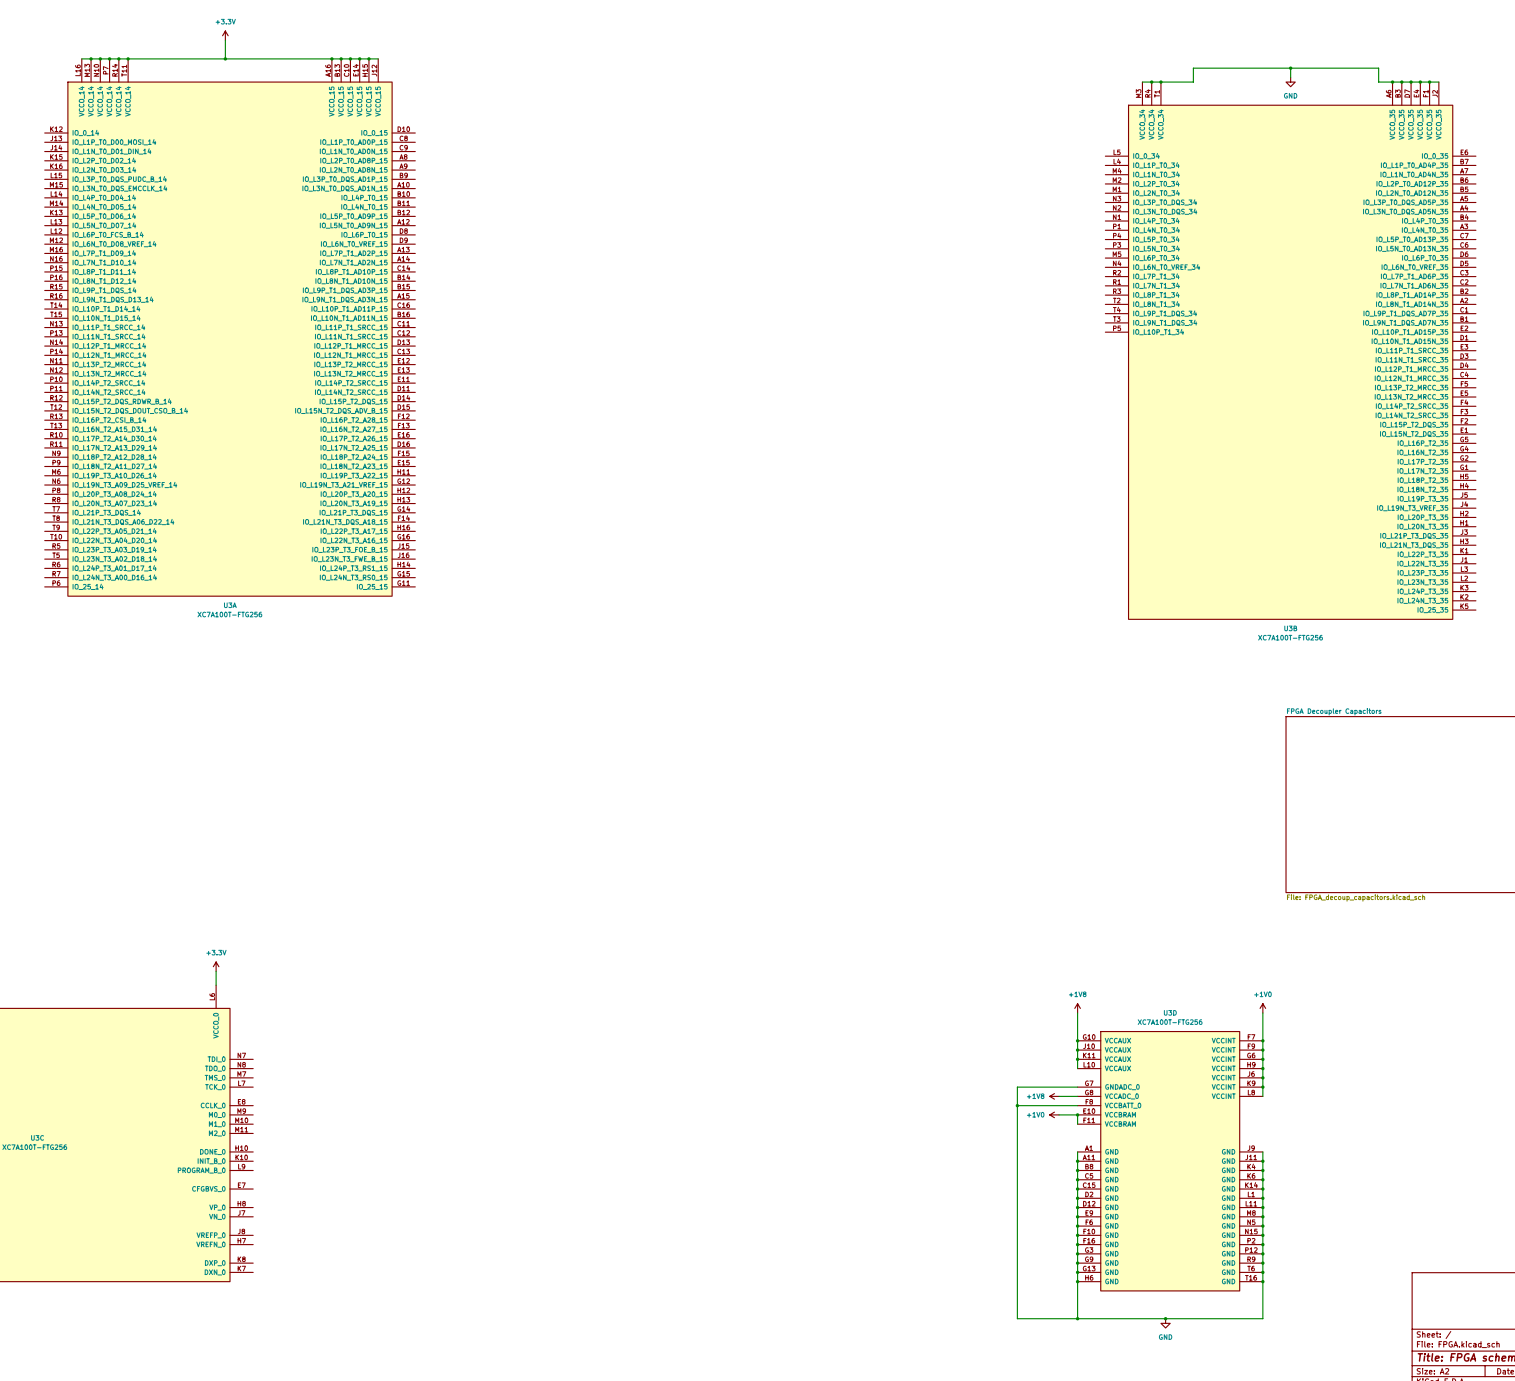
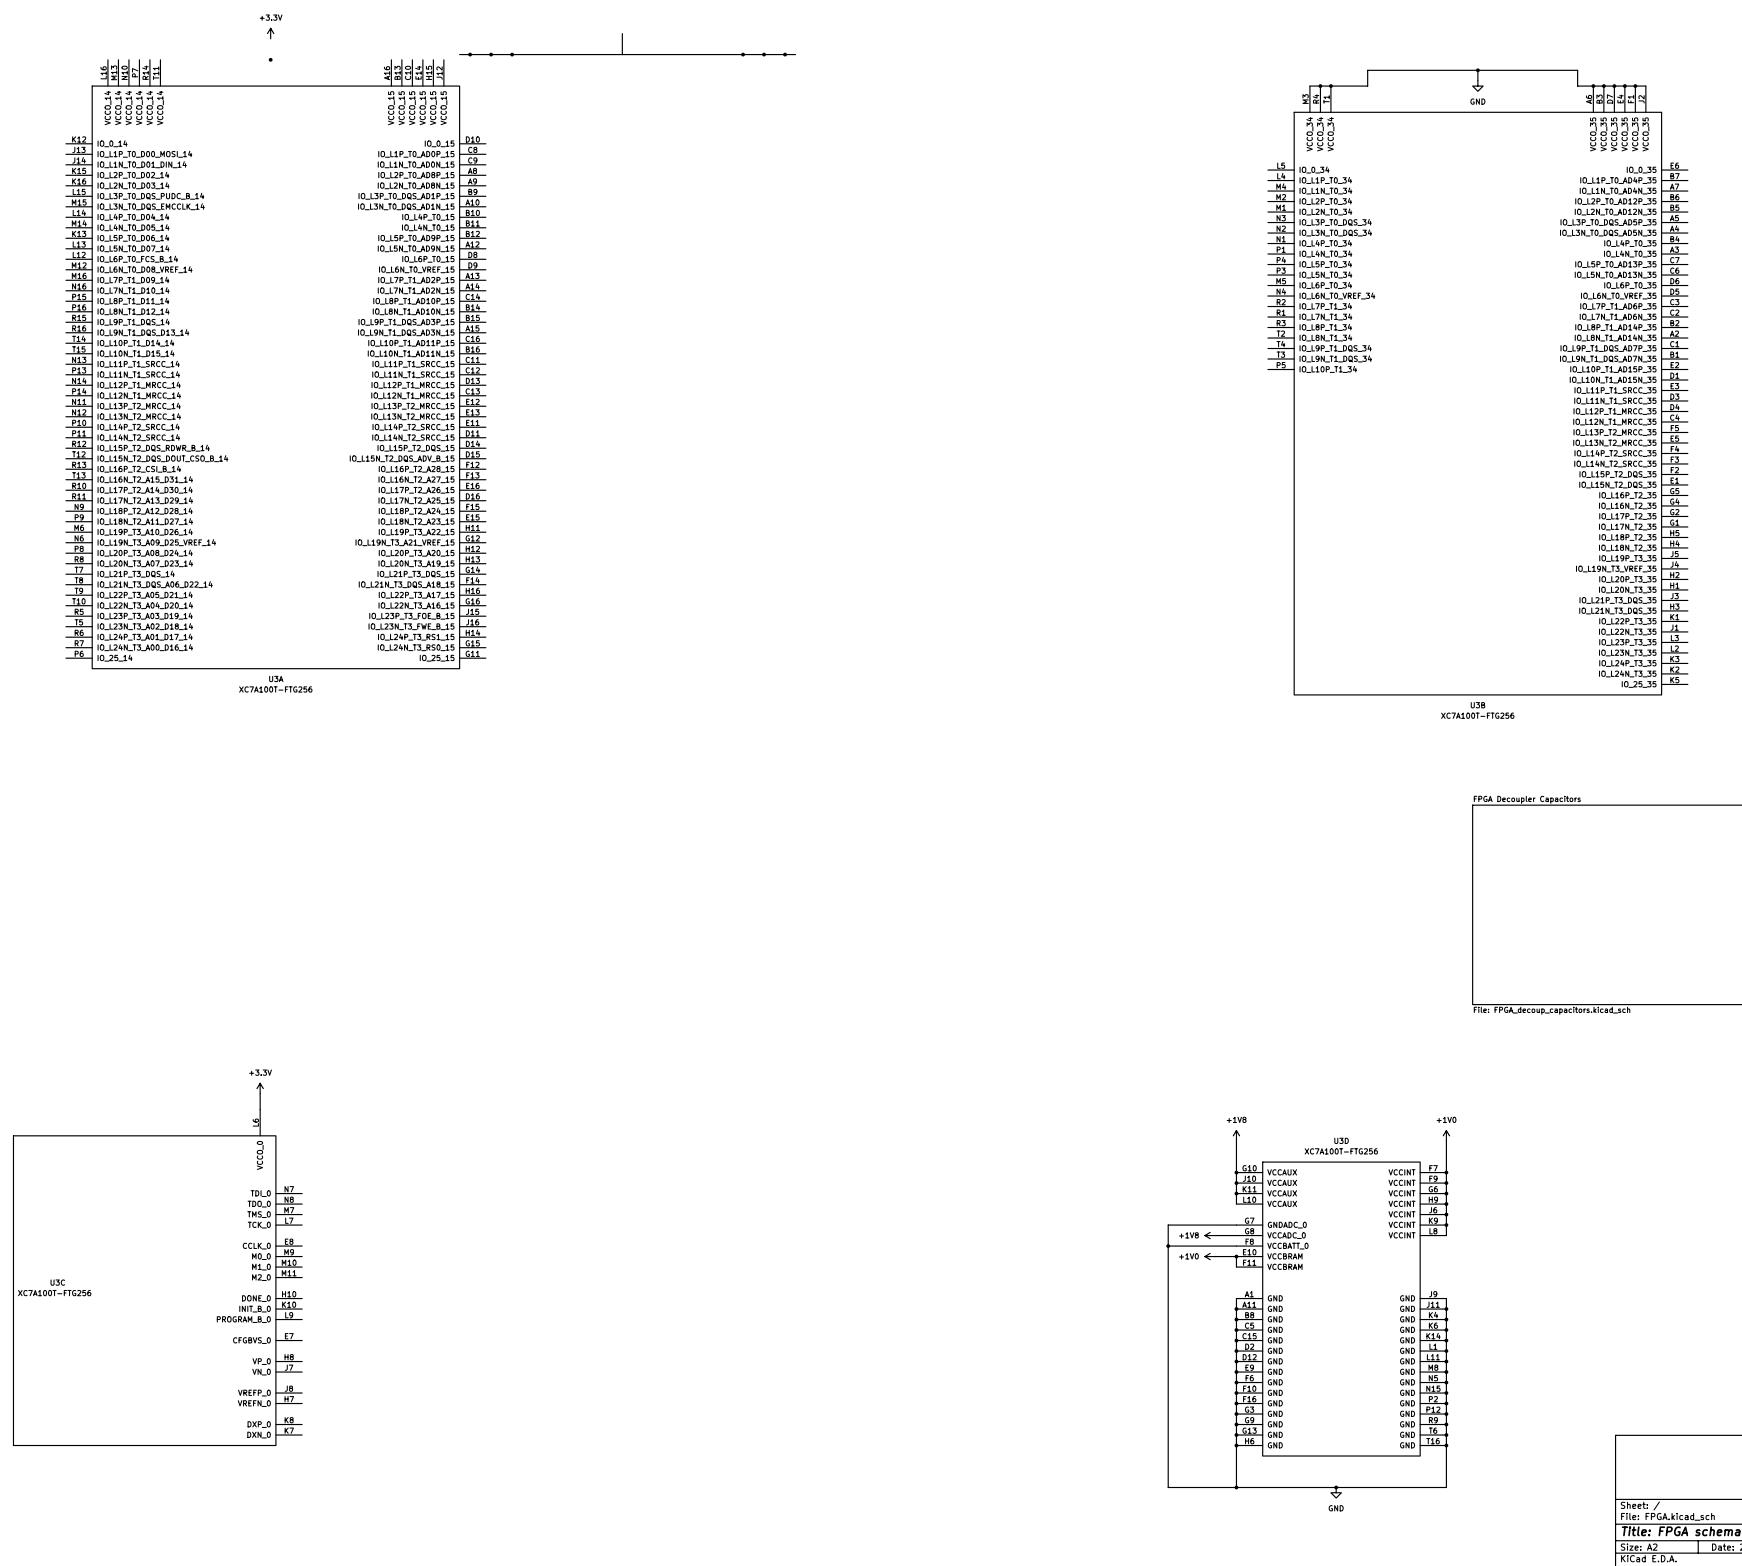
wire: none -> (622, 33) (622, 54)
wire: (225, 40) (225, 58) -> none
wire: none -> (459, 54) (795, 54)
junction: none -> (470, 54)
junction: none -> (491, 54)
junction: none -> (512, 54)
junction: none -> (743, 54)
junction: none -> (764, 54)
junction: none -> (785, 54)
wire: (81, 58) (378, 58) -> none
junction: (91, 58) -> none
junction: (100, 58) -> none
junction: (109, 58) -> none
junction: (118, 58) -> none
junction: (128, 58) -> none
junction: (331, 58) -> none
junction: (341, 58) -> none
junction: (350, 58) -> none
junction: (359, 58) -> none
junction: (368, 58) -> none

